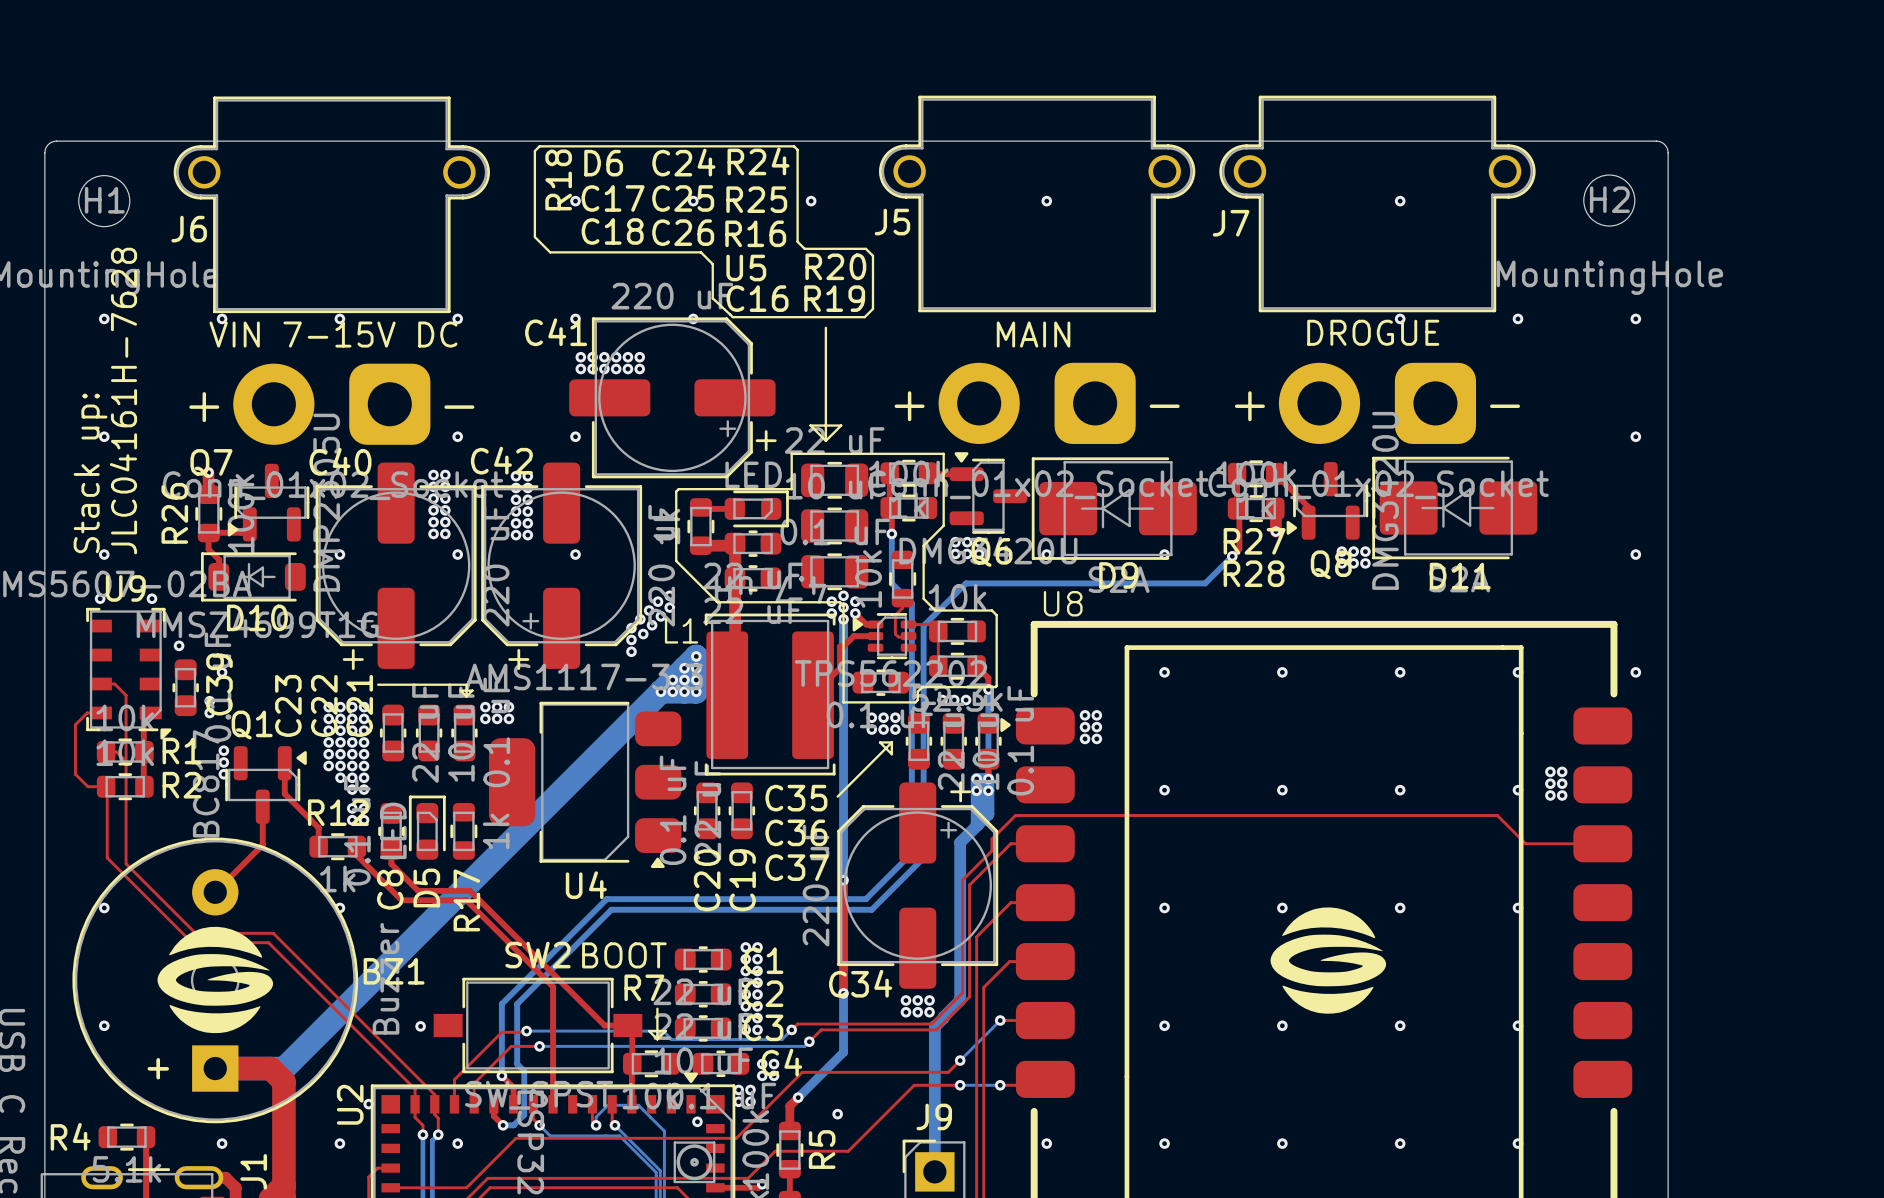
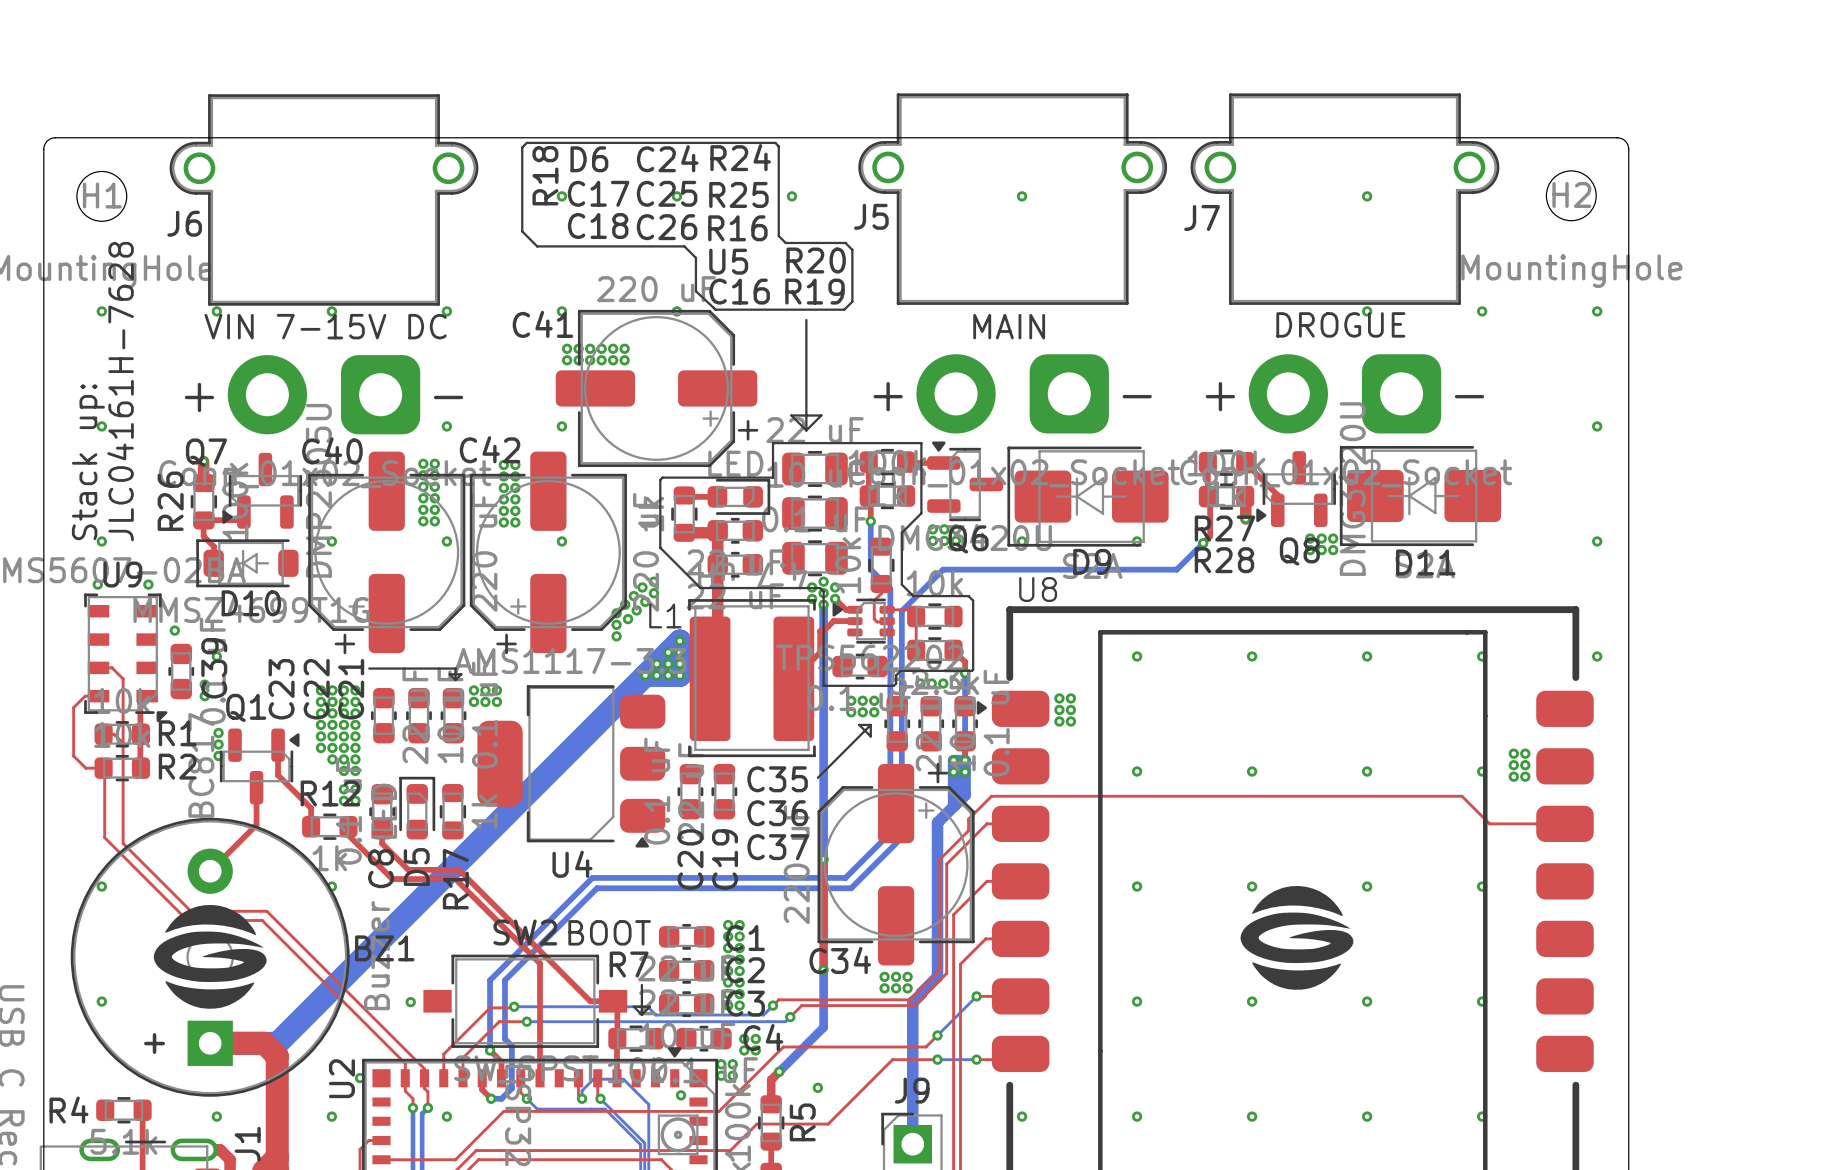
top track: (762, 1184) (758, 1187) (715, 1187) -> none
via: (762, 1184) -> none

